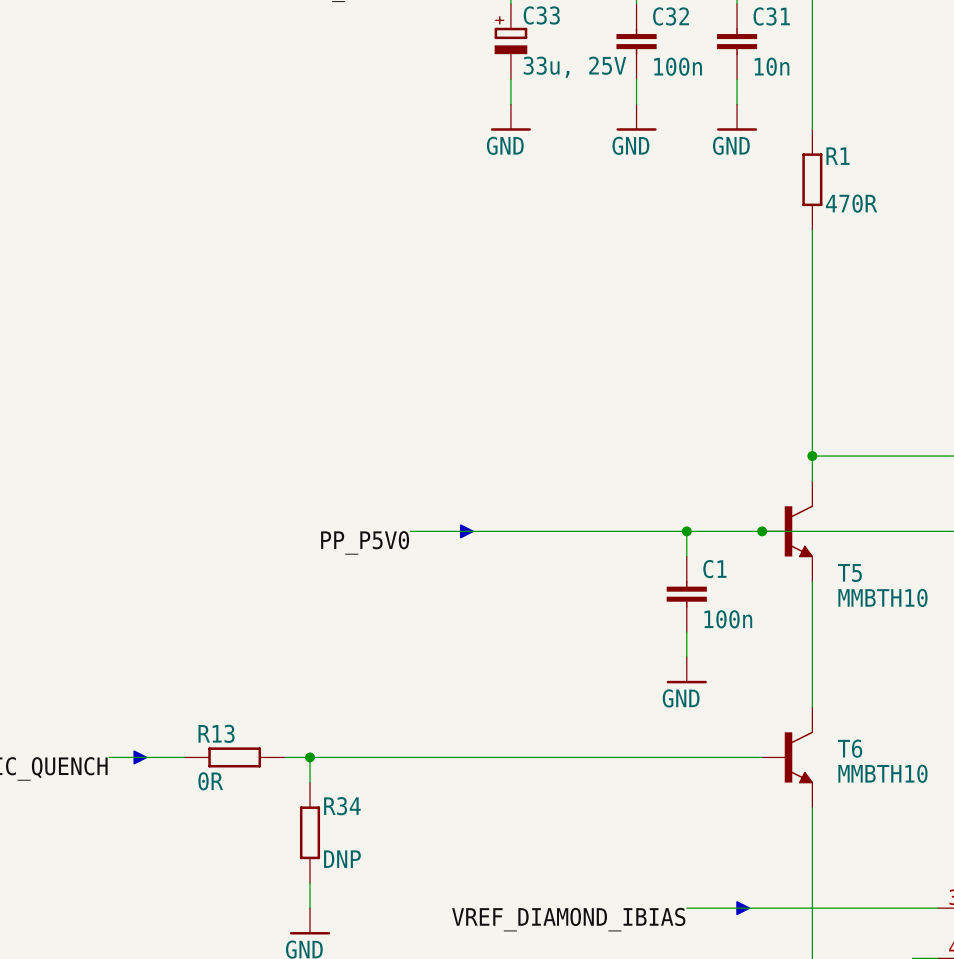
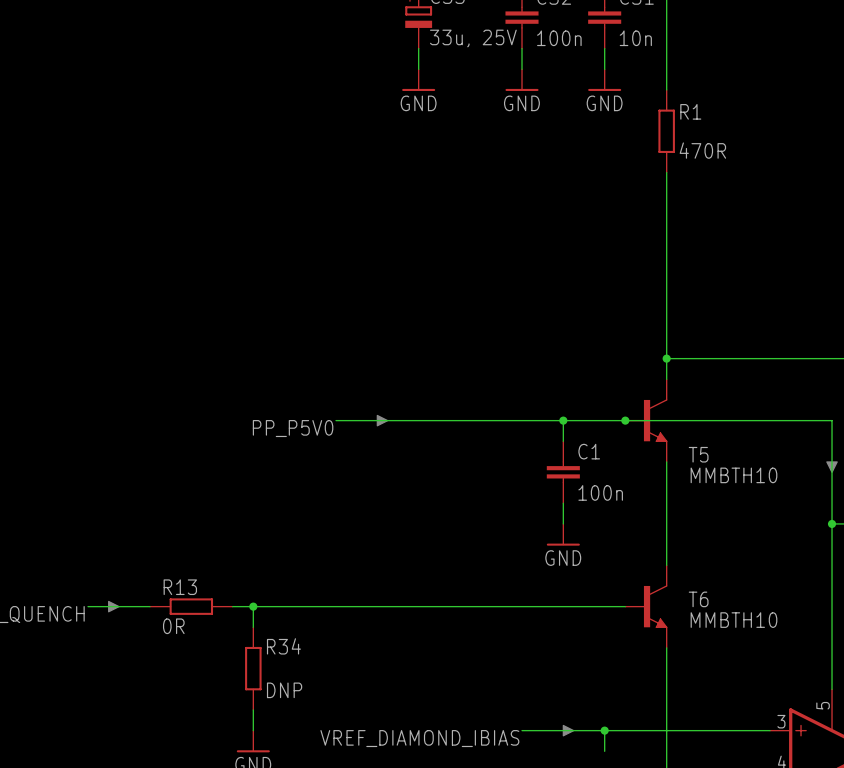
wire: none -> (522, 730) (563, 730)
wire: none -> (604, 730) (604, 751)
junction: none -> (604, 730)
part position: (743, 908) -> (568, 730)
label position: VREF_DIAMOND_IBIAS (568, 919) -> VREF_DIAMOND_IBIAS (419, 738)

